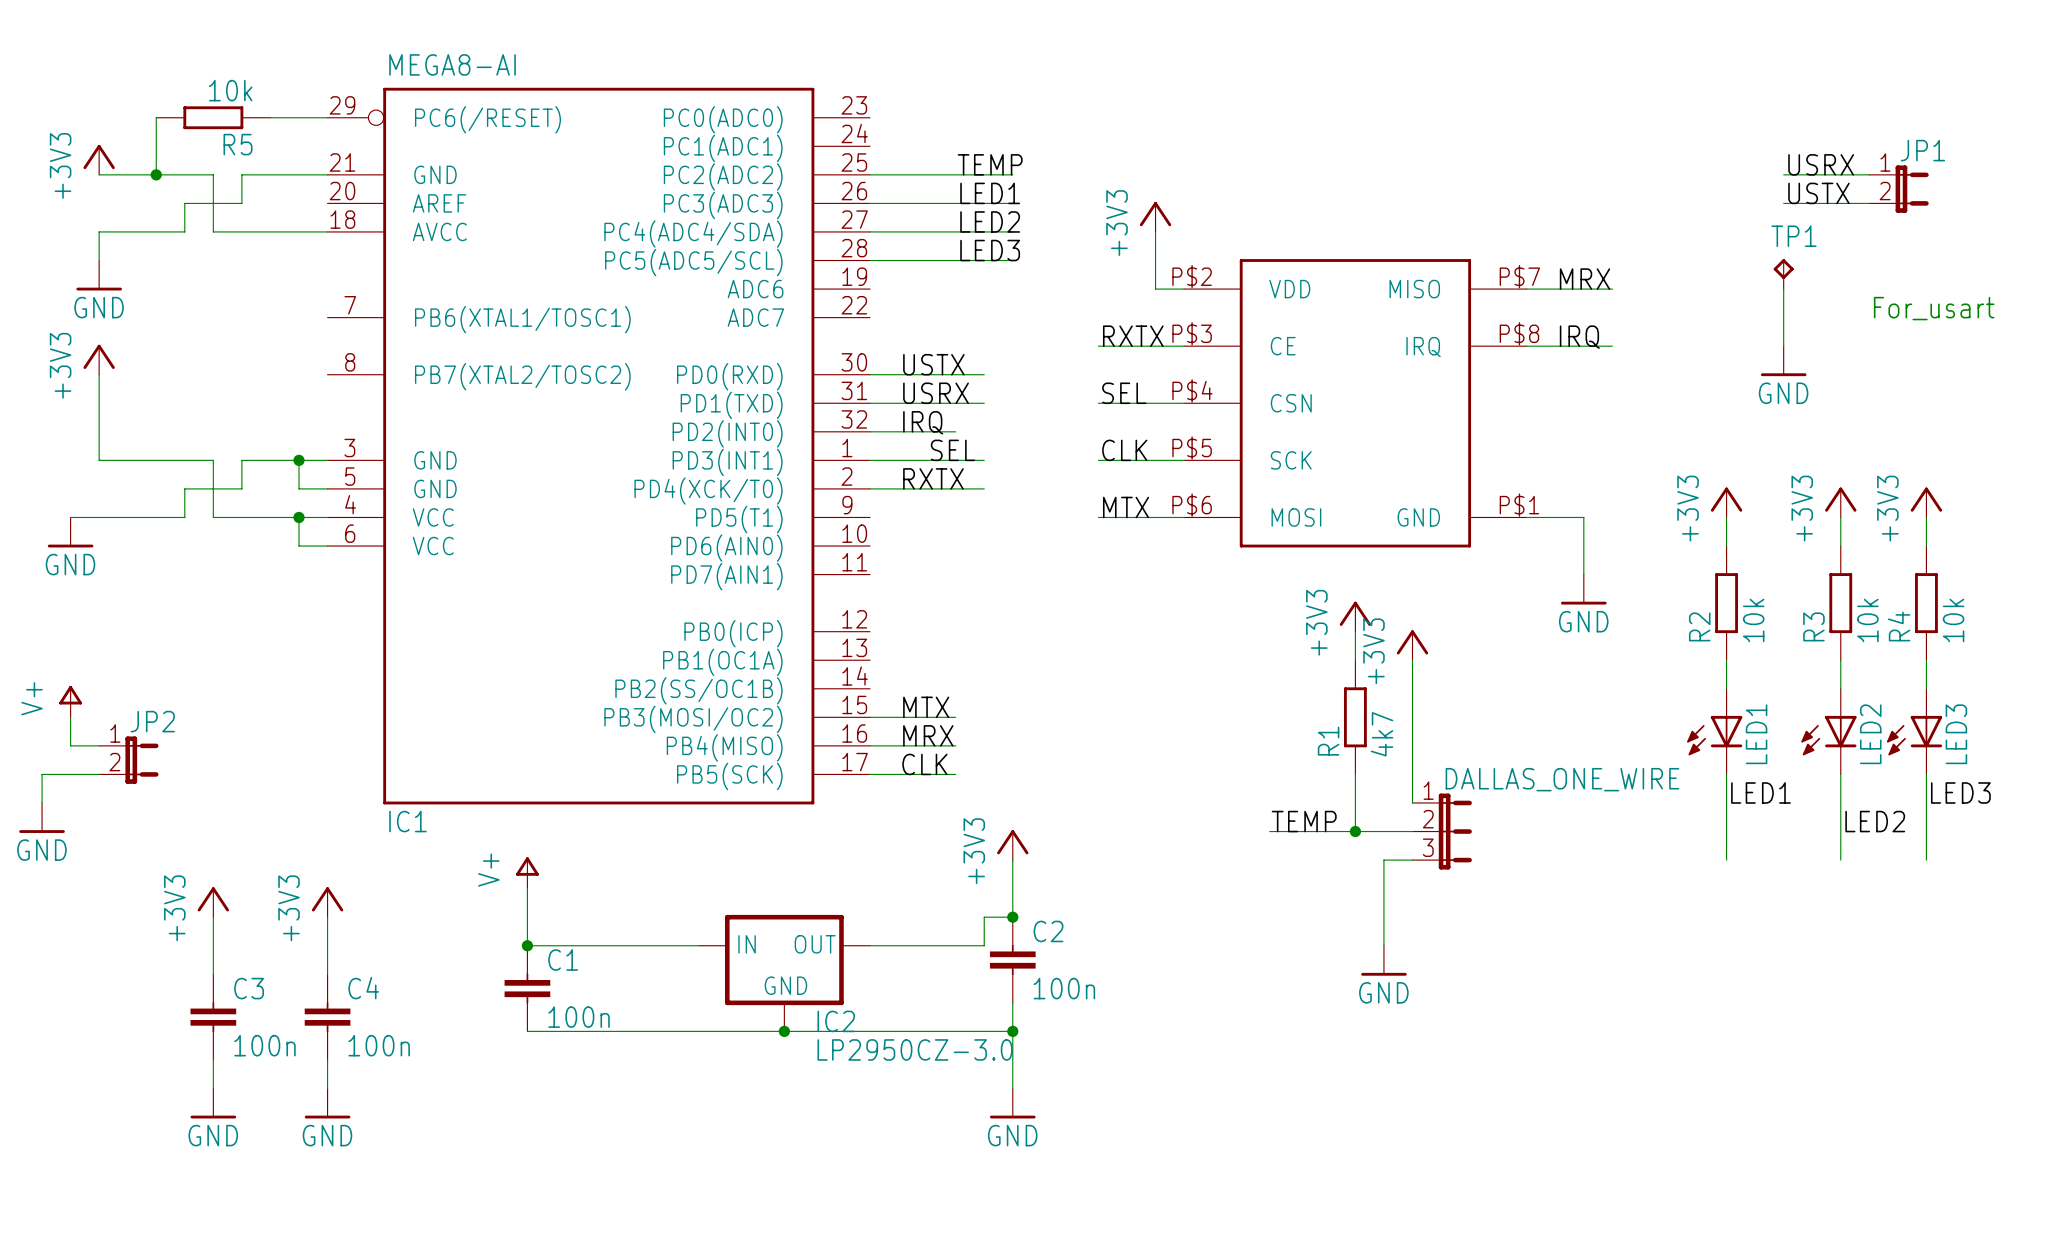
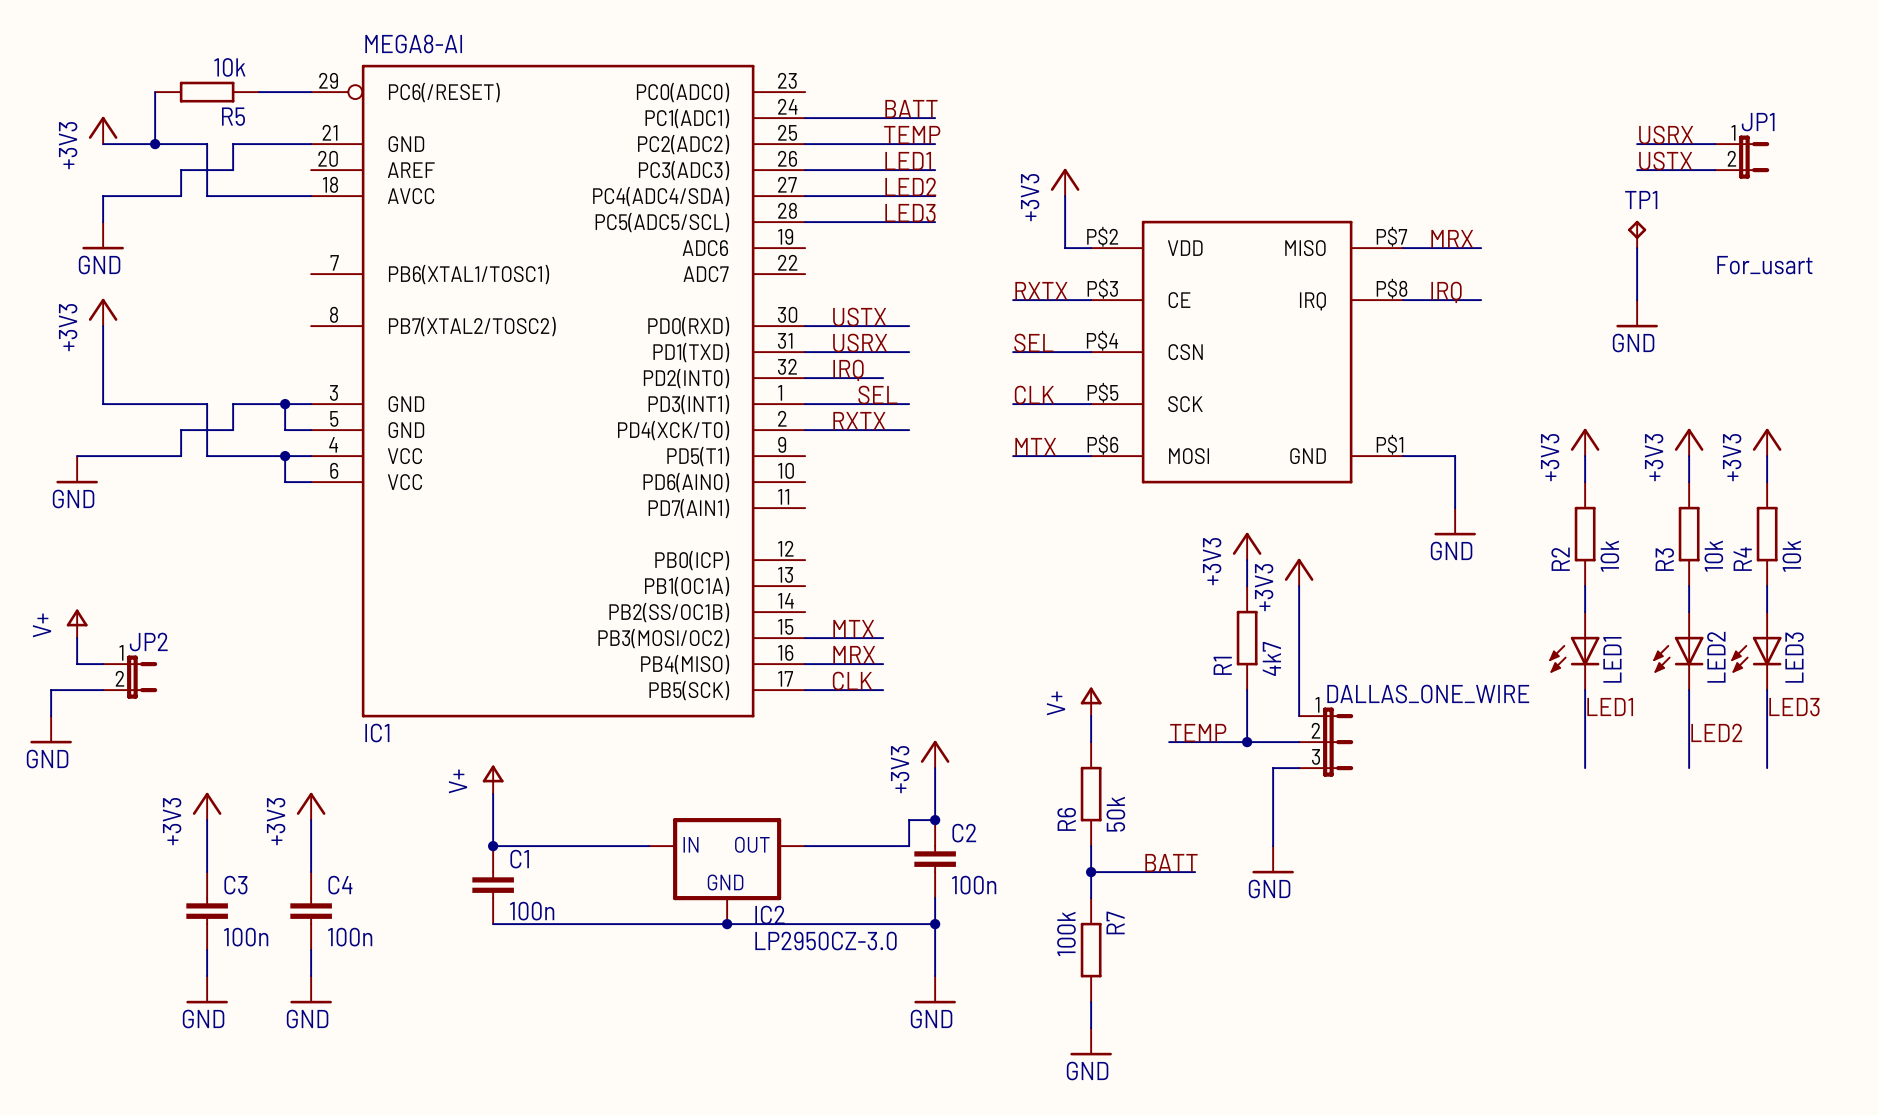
label: none -> BATT (911, 109)
wire: none -> (805, 118) (935, 118)
power symbol: none -> V+ (1091, 701)
wire: none -> (1091, 716) (1091, 742)
R6: none -> 50k (1091, 794)
wire: none -> (1091, 846) (1091, 898)
label: none -> BATT (1171, 863)
wire: none -> (1091, 872) (1195, 872)
junction: none -> (1091, 872)
R7: none -> 100k (1091, 950)
wire: none -> (1091, 1002) (1091, 1028)
power symbol: none -> GND (1091, 1041)

